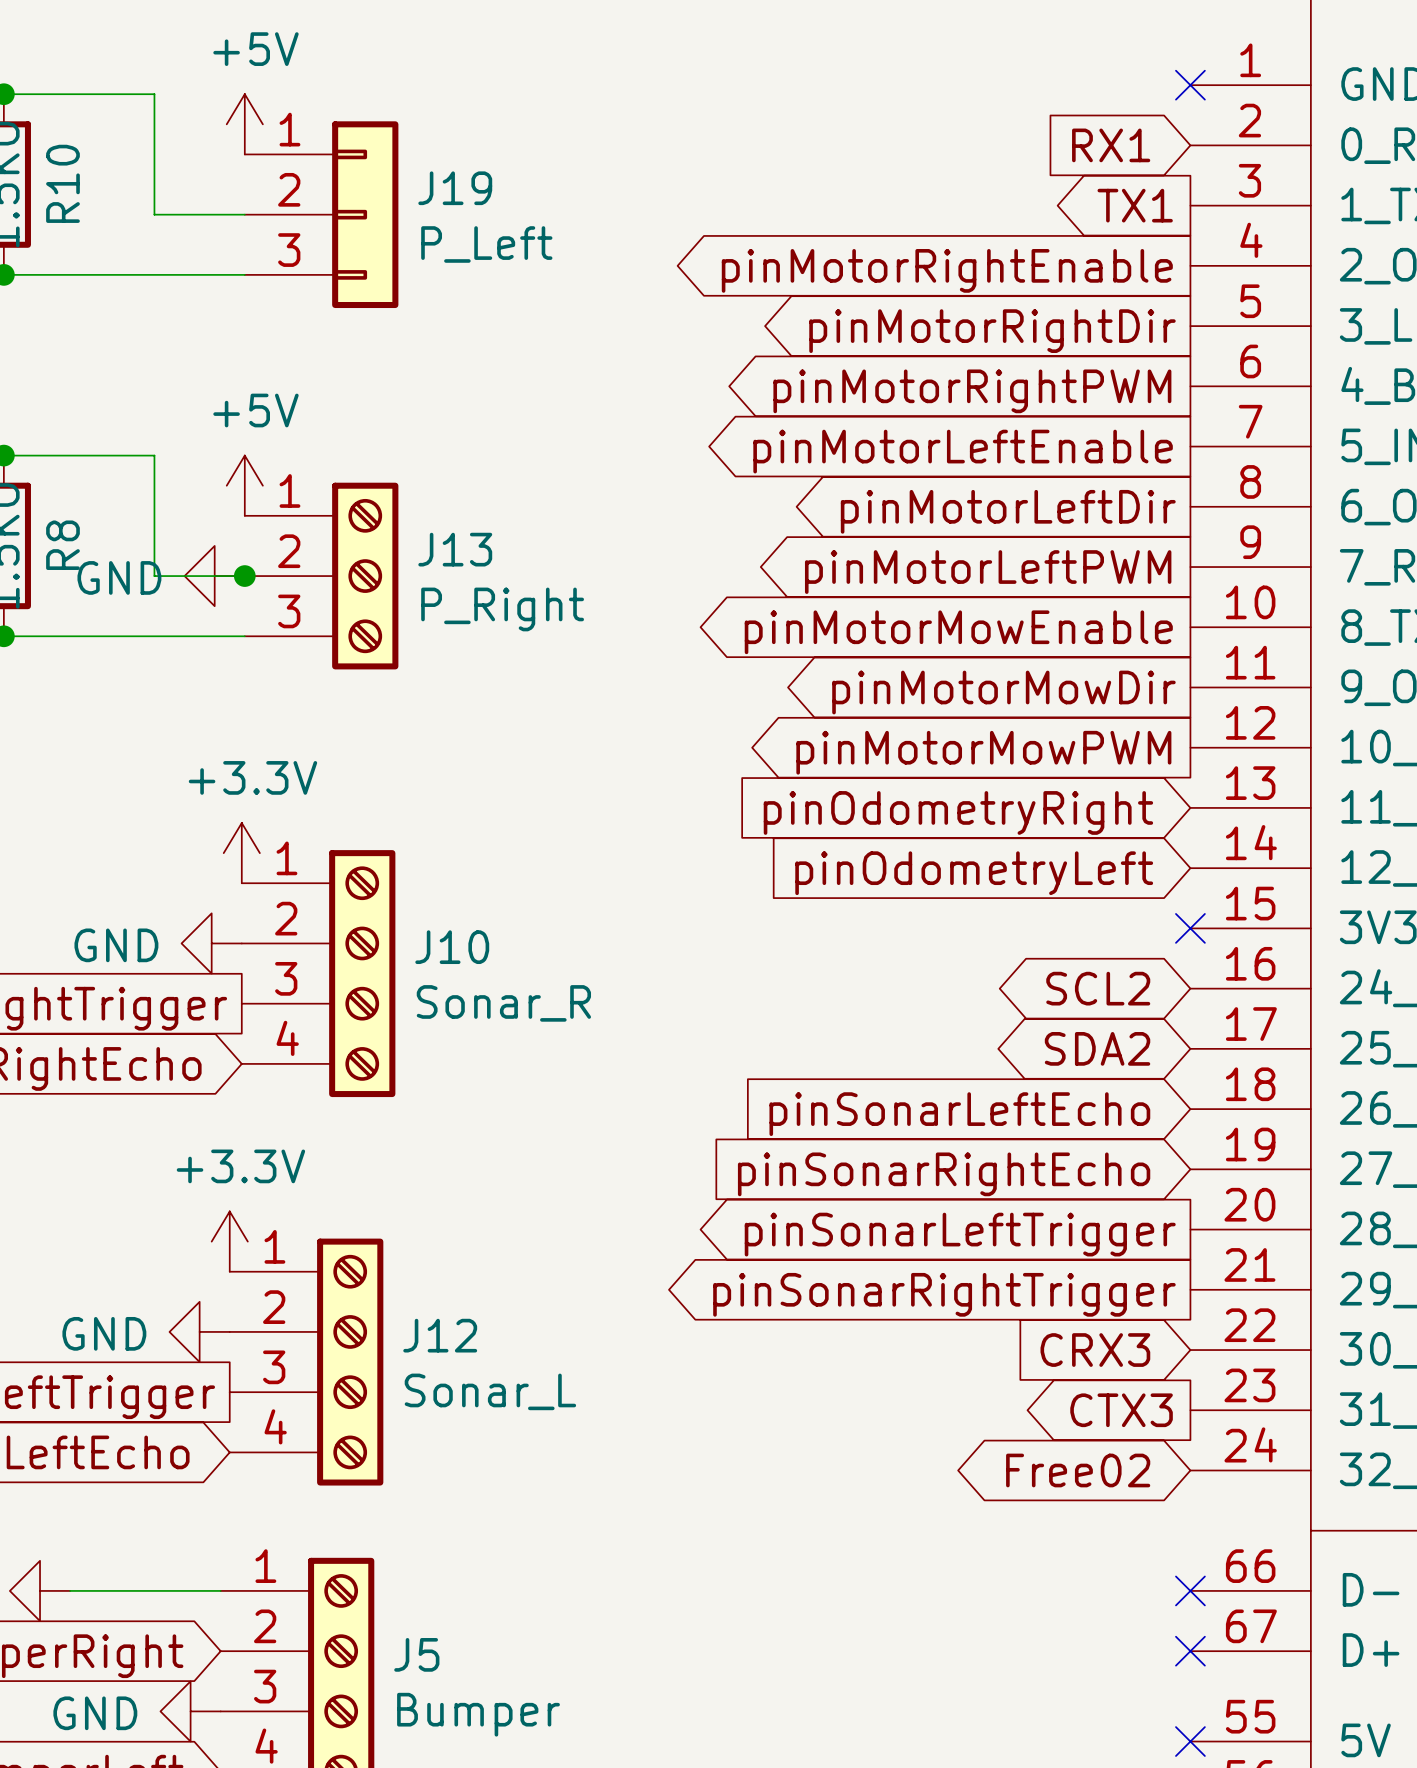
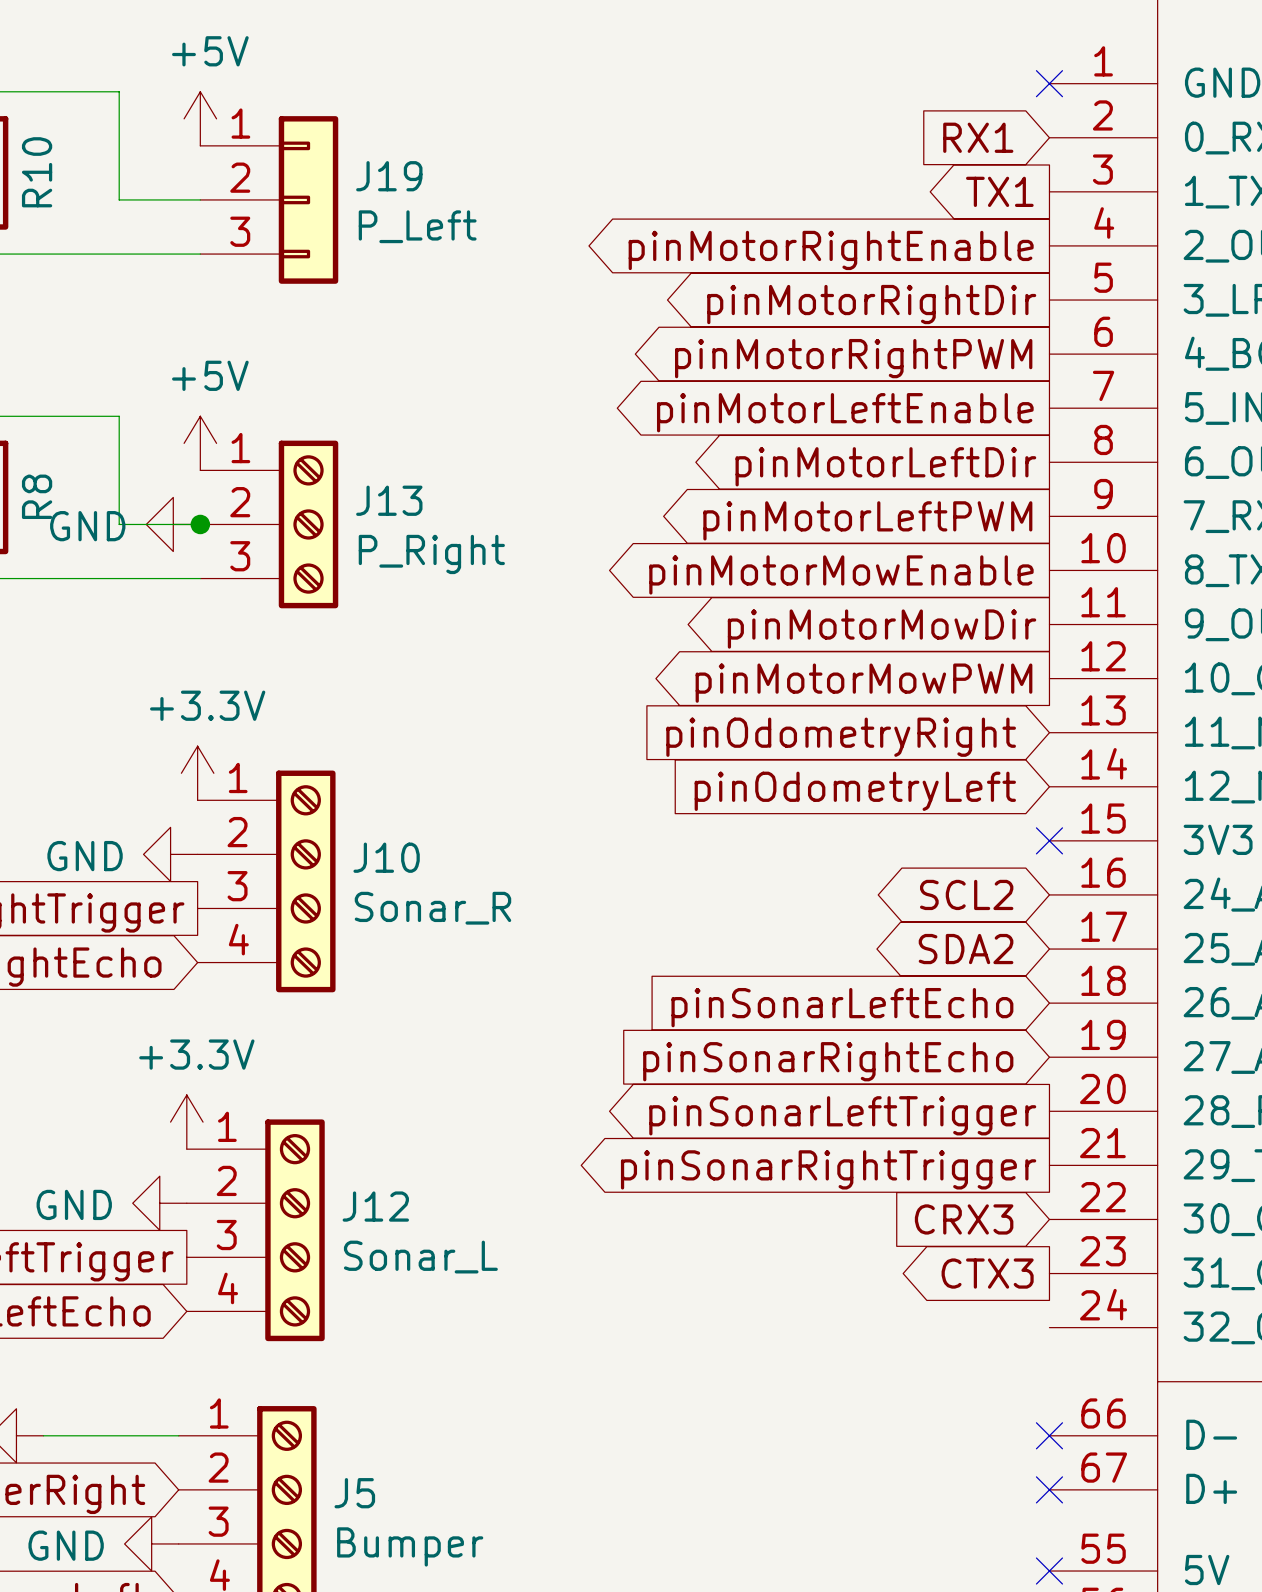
global label: Free02 (1078, 1470) -> none

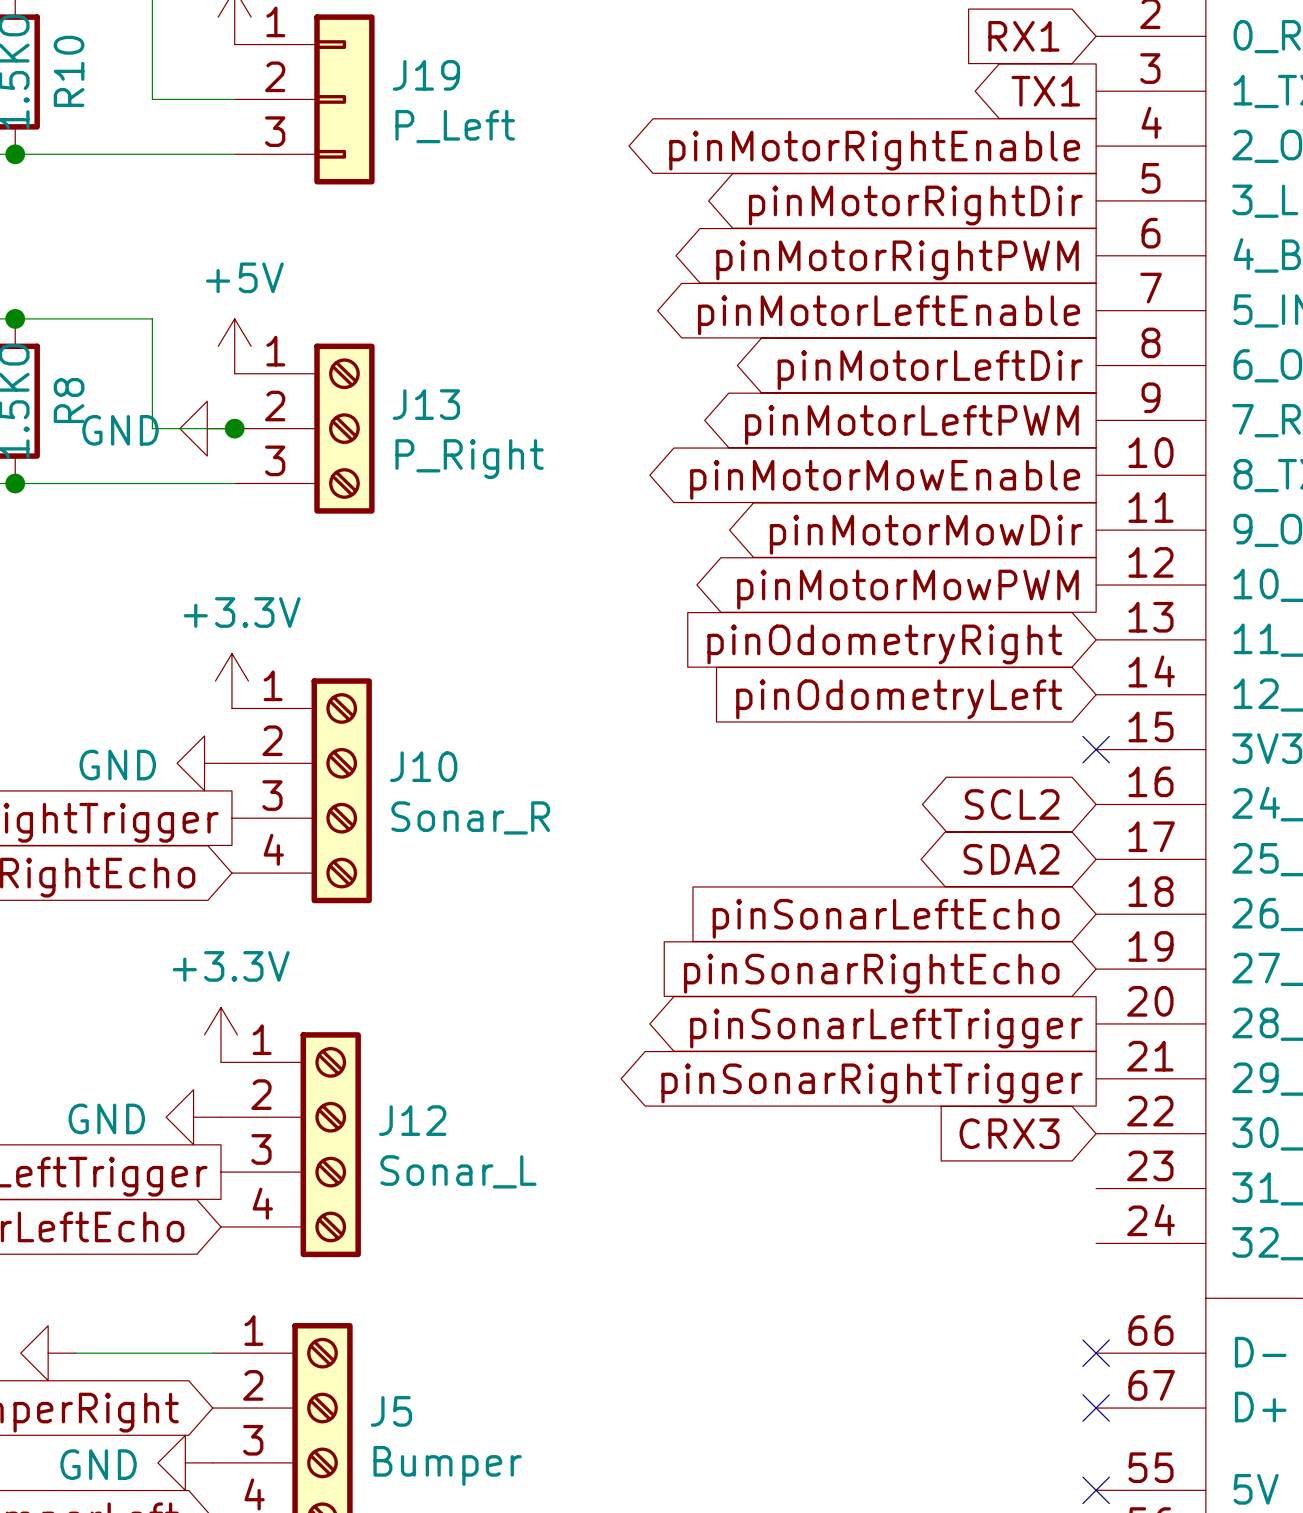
global label: CTX3 (987, 1273) -> none

